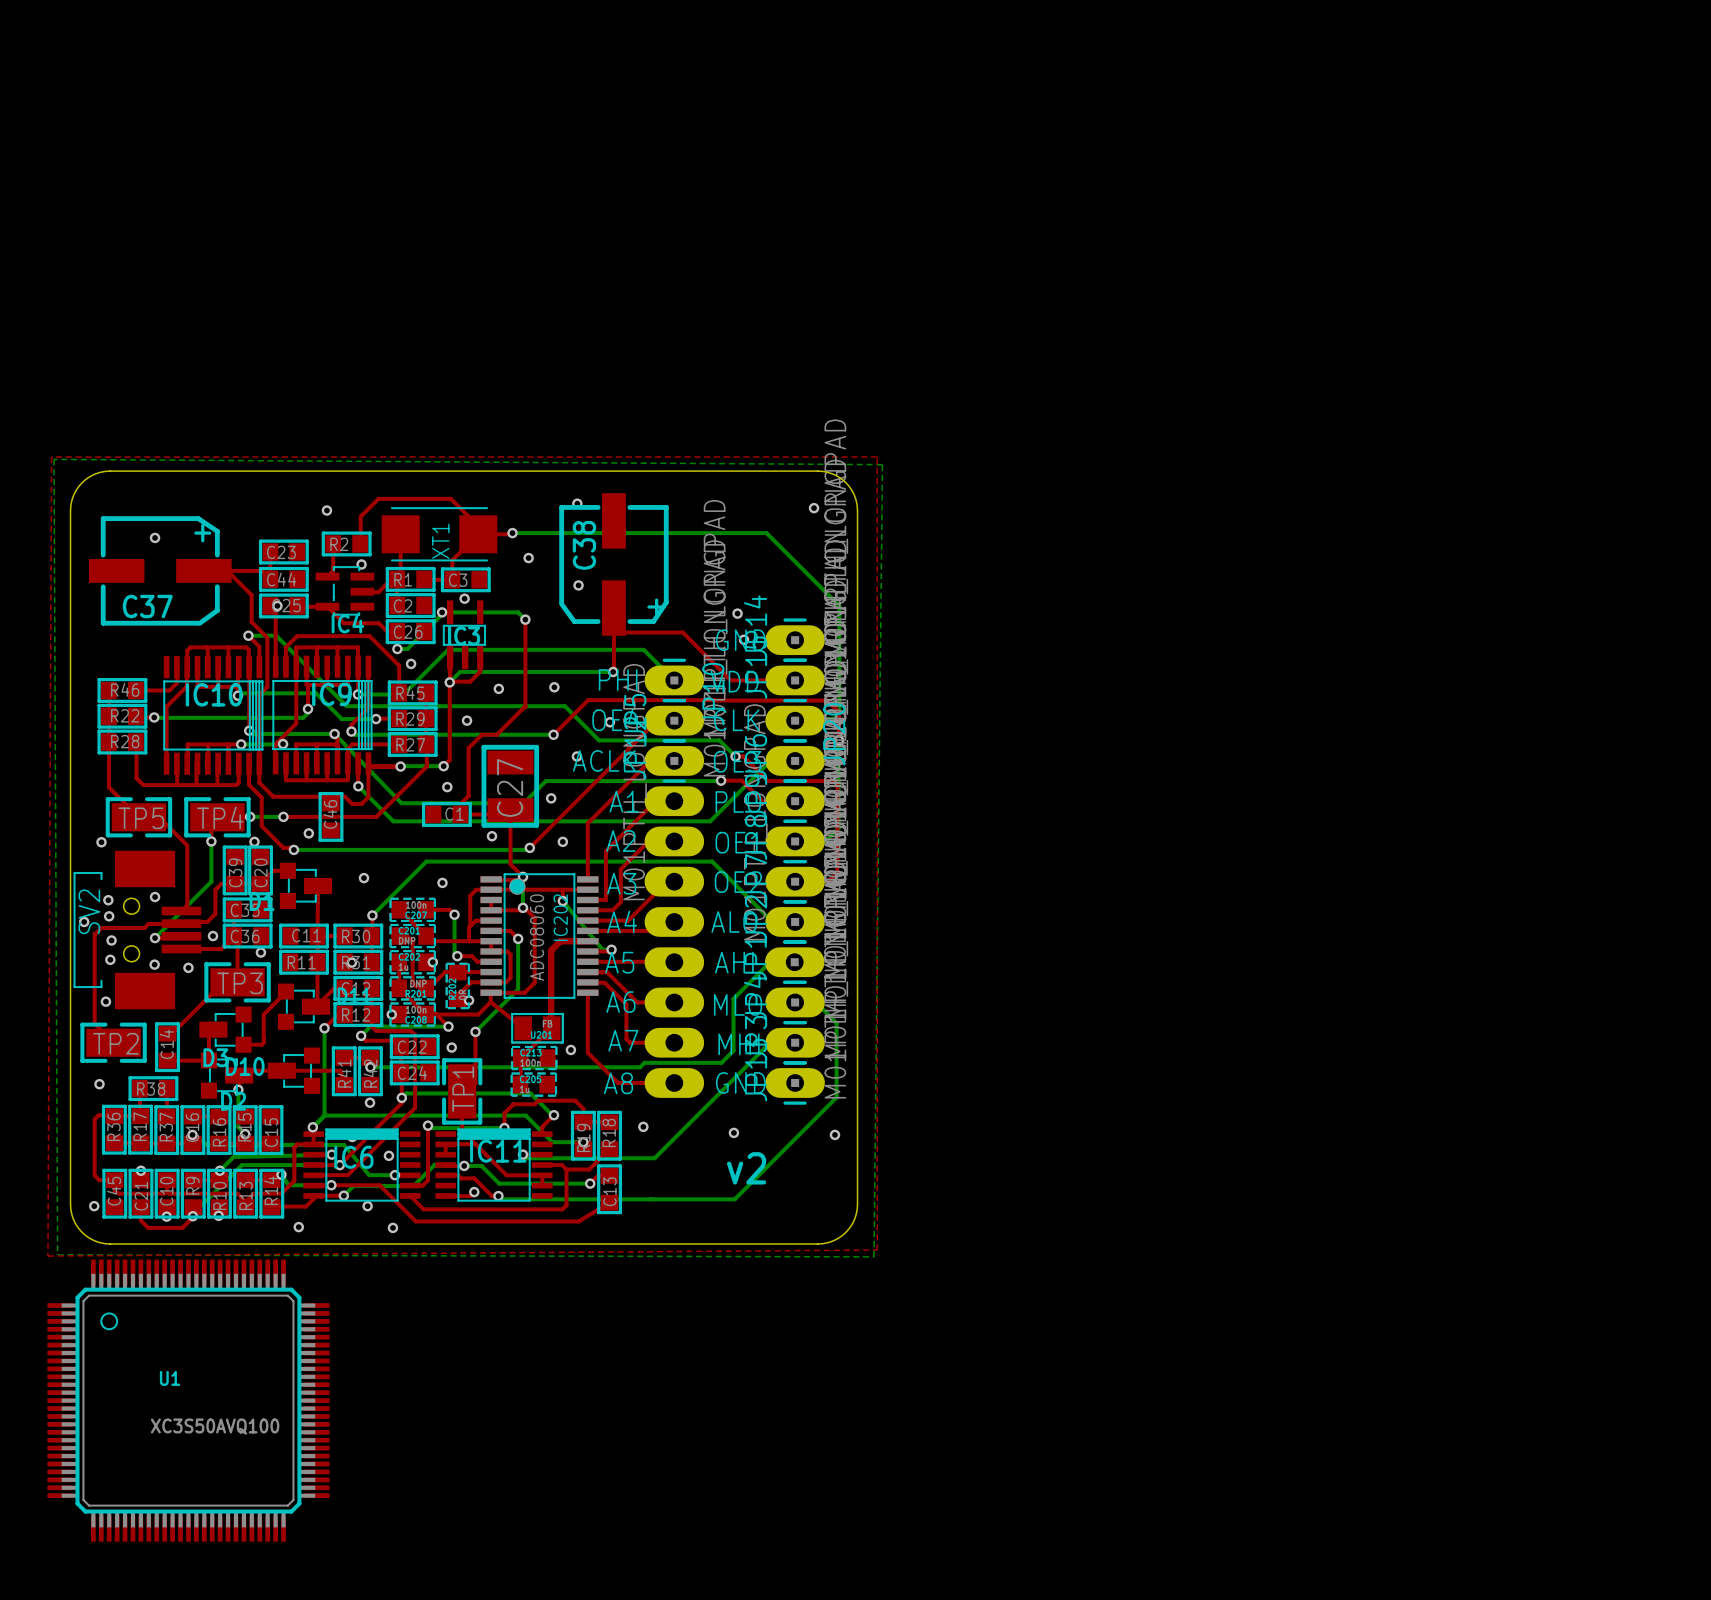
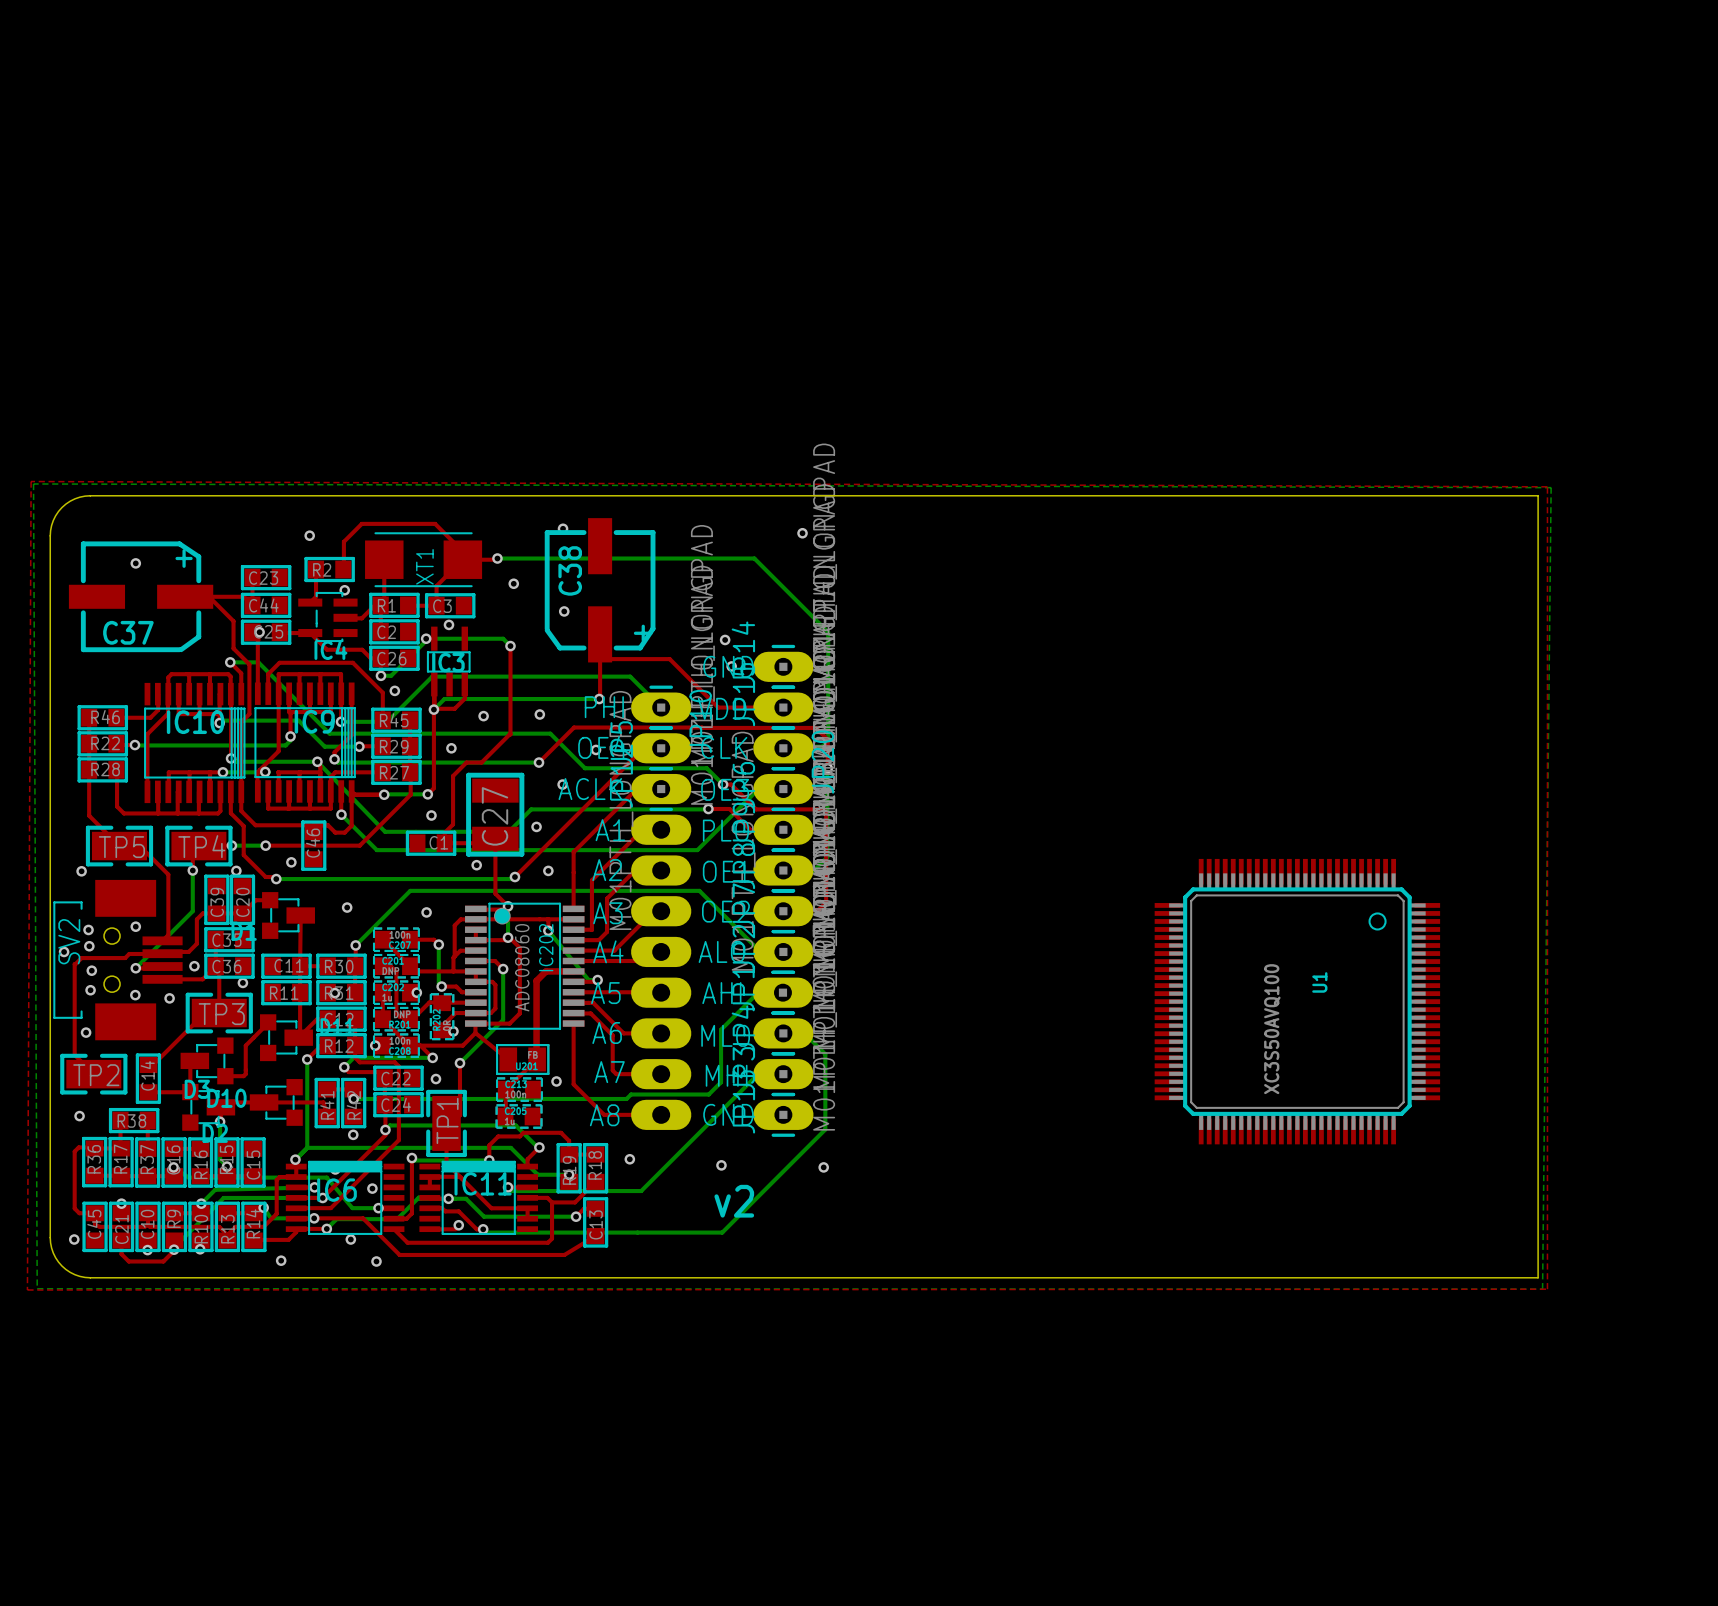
top zone outline: (51, 457) (877, 457) (877, 1250) (47, 1256) -> (31, 481) (1547, 486) (1547, 1289) (27, 1290)
bottom zone outline: (54, 459) (882, 464) (874, 1256) (57, 1254) -> (33, 483) (1551, 487) (1542, 1289) (37, 1288)
board edge: (817, 471) (833, 474) (845, 482) (854, 495) (857, 510) (857, 1204) (854, 1219) (845, 1232) (833, 1240) (817, 1244) -> (806, 495) (1538, 495) (1538, 1277) (806, 1277)
U1 rotation: 0° (188, 1400) -> 90° clockwise (1297, 1001)
U1 position: (188, 1400) -> (1297, 1001)

